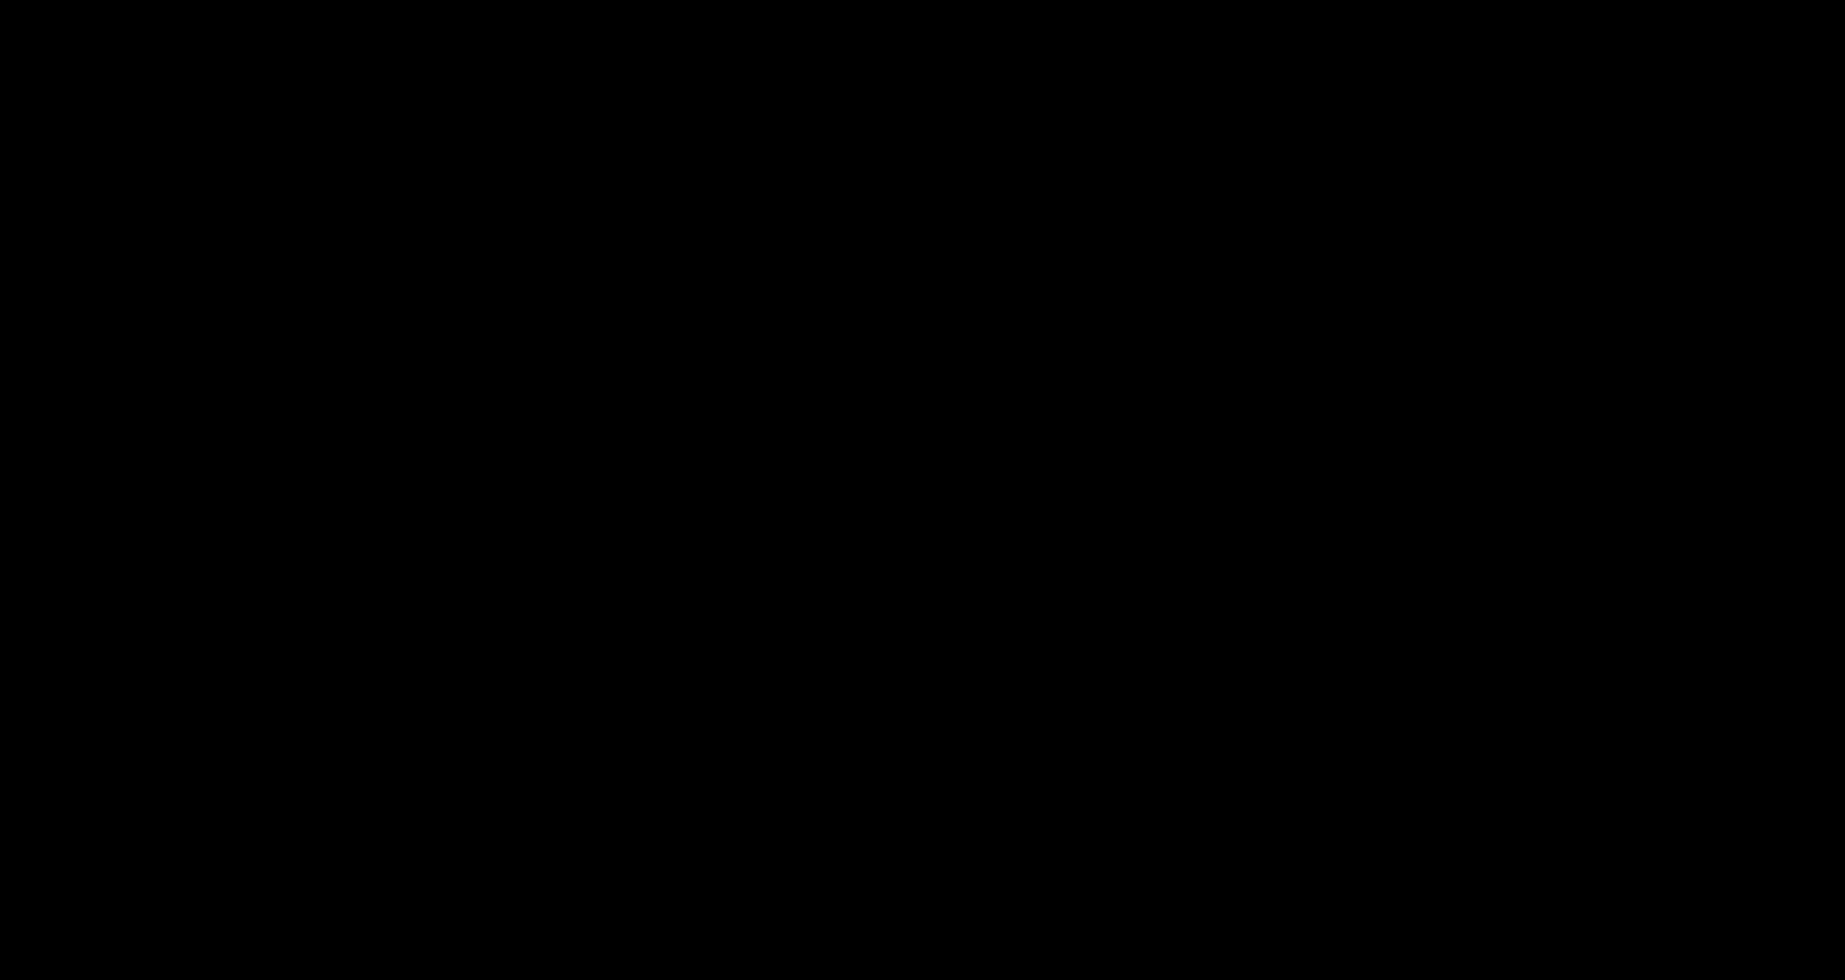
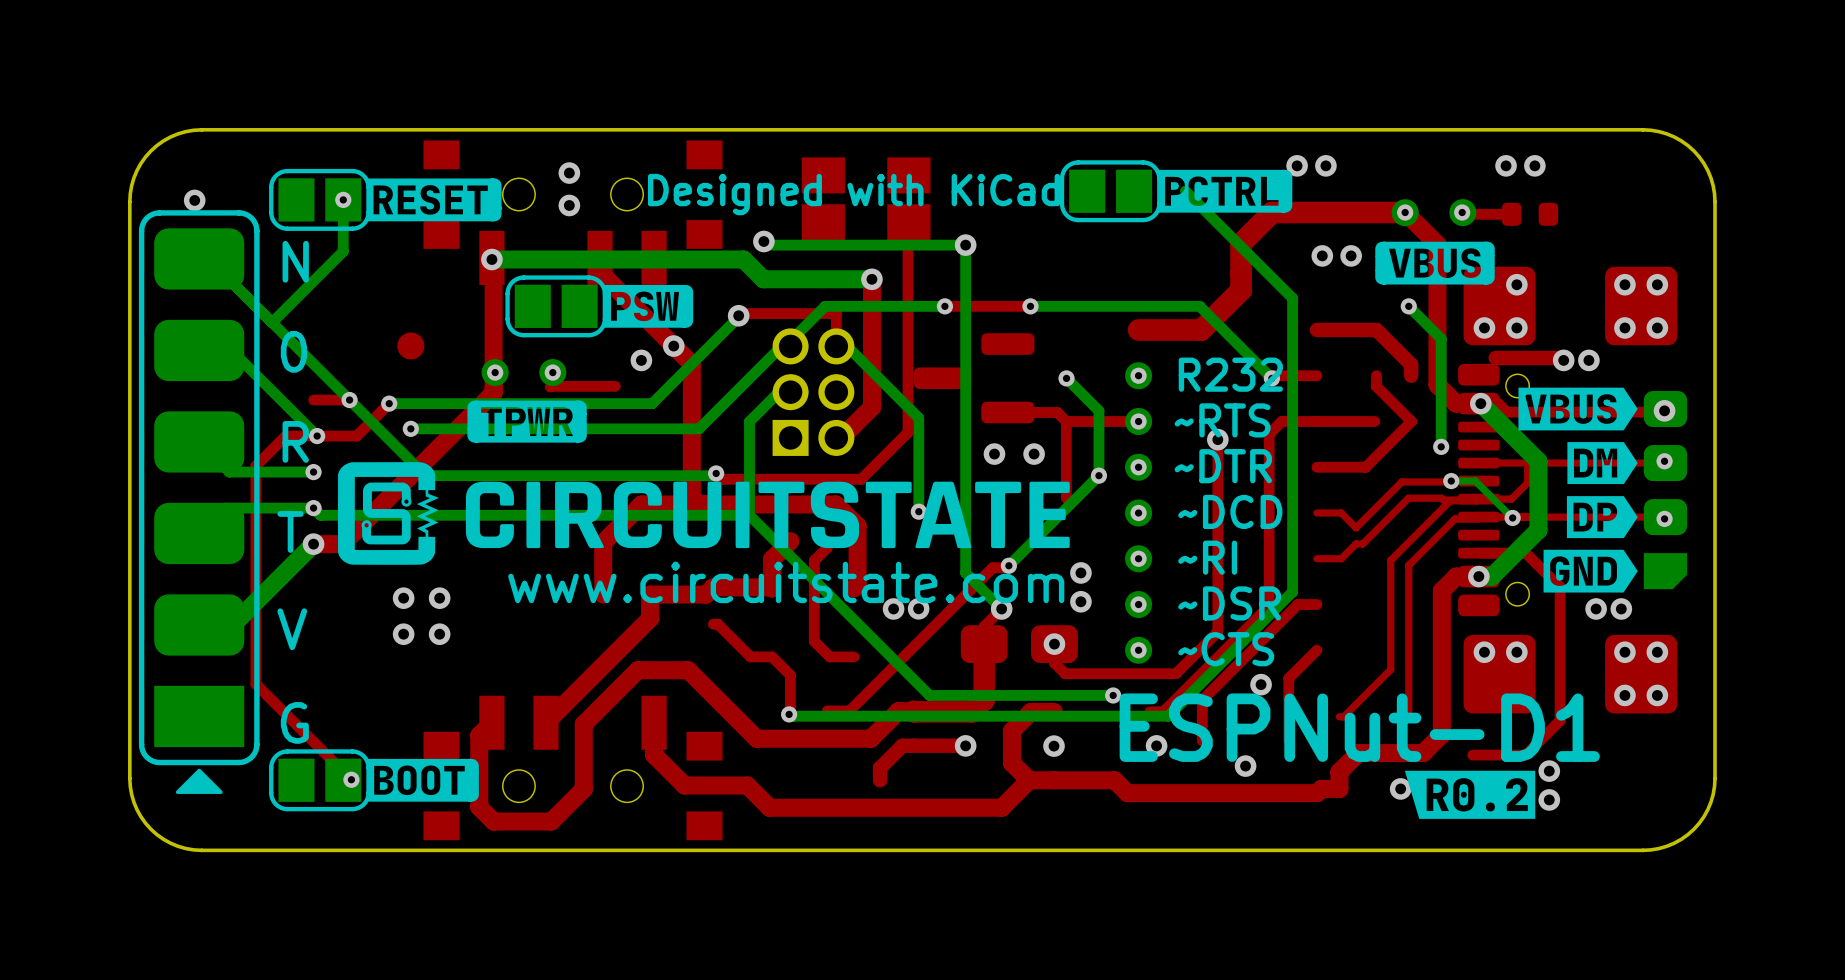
board edge: none -> (1642, 129) (201, 129) (185, 131) (170, 136) (156, 145) (140, 163) (133, 178) (129, 201) (129, 778) (131, 794) (136, 809) (145, 823) (163, 839) (178, 846) (201, 850) (1642, 850) (1658, 848) (1674, 843) (1687, 834) (1699, 823) (1710, 802) (1714, 786) (1715, 201) (1710, 178) (1703, 163) (1693, 150) (1681, 140) (1666, 133) (1642, 129)
via: none -> (1297, 165)
via: none -> (1325, 165)
via: none -> (1506, 165)
via: none -> (1534, 165)
drawing: none -> [1158, 169, 1293, 213]
via: none -> (569, 173)
drawing: none -> [366, 178, 502, 222]
part: none -> (1110, 191)
bottom track: none -> (1185, 191) (1292, 298) (1292, 591) (1168, 716) (793, 716) (789, 714)
text: none -> Designed with KiCad (853, 194)
part: none -> (823, 198)
part: none -> (908, 198)
part: none -> (319, 199)
bottom track: none -> (343, 199) (343, 251) (272, 322)
via: none -> (343, 199)
via: none -> (194, 200)
via: none -> (569, 205)
part: none -> (572, 212)
part: none -> (1405, 212)
via: none -> (1405, 212)
top track: none -> (1462, 212) (1463, 214) (1511, 214)
part: none -> (1462, 212)
via: none -> (1462, 212)
part: none -> (1530, 214)
top track: none -> (908, 222) (908, 432) (861, 479) (721, 479) (716, 473)
bottom track: none -> (763, 241) (767, 245) (965, 245) (965, 572) (1001, 608)
via: none -> (763, 241)
drawing: none -> [1375, 241, 1495, 285]
via: none -> (965, 245)
via: none -> (1322, 255)
via: none -> (1351, 255)
top track: none -> (491, 257) (493, 259) (493, 392) (342, 544) (313, 544)
top track: none -> (600, 257) (600, 272) (691, 364) (691, 497) (699, 504)
bottom track: none -> (199, 258) (208, 258) (425, 475) (713, 475) (716, 473)
bottom track: none -> (491, 259) (743, 259) (763, 279) (871, 279)
via: none -> (491, 259)
text: none -> N (295, 261)
top track: none -> (871, 279) (871, 407) (841, 437) (836, 437)
via: none -> (871, 279)
drawing: none -> [604, 284, 694, 328]
via: none -> (1516, 284)
via: none -> (1624, 284)
via: none -> (1657, 284)
part: none -> (556, 306)
bottom track: none -> (944, 306) (825, 306) (790, 340) (790, 346) (781, 346) (699, 428) (410, 428)
via: none -> (944, 306)
top track: none -> (1030, 306) (944, 306)
bottom track: none -> (1030, 306) (1199, 306) (1271, 378)
via: none -> (1030, 306)
bottom track: none -> (1408, 306) (1441, 338) (1441, 446)
via: none -> (1408, 306)
top track: none -> (738, 315) (740, 313) (836, 313) (836, 346)
bottom track: none -> (738, 315) (652, 403) (389, 403)
via: none -> (738, 315)
via: none -> (1484, 327)
via: none -> (1516, 327)
via: none -> (1624, 327)
via: none -> (1657, 327)
top track: none -> (1138, 329) (1201, 329) (1241, 290) (1241, 243) (1272, 212) (1405, 212) (1437, 244) (1437, 384) (1456, 403) (1498, 403) (1506, 412) (1664, 410)
top track: none -> (1316, 329) (1376, 329) (1411, 364) (1411, 375)
part: none -> (410, 345)
via: none -> (673, 346)
bottom track: none -> (836, 346) (847, 346) (918, 418) (918, 511)
bottom track: none -> (199, 350) (231, 350) (317, 436)
text: none -> 0 (293, 351)
top track: none -> (1495, 358) (1561, 358) (1563, 360)
via: none -> (641, 360)
via: none -> (1563, 360)
via: none -> (1588, 360)
part: none -> (495, 372)
via: none -> (495, 372)
part: none -> (552, 372)
via: none -> (552, 372)
text: none -> R232 (1230, 374)
part: none -> (1138, 375)
via: none -> (1138, 375)
top track: none -> (1316, 375) (1274, 375) (1271, 378)
top track: none -> (1376, 375) (1376, 386) (1411, 421) (1365, 467) (1316, 467)
part: none -> (974, 378)
bottom track: none -> (1066, 378) (1098, 410) (1098, 475) (1008, 565)
via: none -> (1066, 378)
via: none -> (1271, 378)
top track: none -> (615, 386) (550, 387)
drawing: none -> [1518, 387, 1638, 593]
bottom track: none -> (790, 392) (778, 392) (749, 421) (749, 515)
part: none -> (813, 392)
drawing: none -> [337, 400, 1070, 565]
top track: none -> (349, 400) (313, 400)
via: none -> (349, 400)
top track: none -> (389, 403) (356, 436) (285, 436) (255, 465) (255, 684) (351, 779)
via: none -> (389, 403)
bottom track: none -> (1480, 403) (1538, 461) (1538, 530) (1491, 576) (1478, 576)
via: none -> (1480, 403)
via: none -> (1664, 410)
top track: none -> (1007, 412) (1057, 412) (1066, 421)
text: none -> ~RTS (1222, 420)
top track: none -> (1066, 421) (1066, 498)
top track: none -> (1138, 421) (1066, 421)
part: none -> (1138, 421)
via: none -> (1138, 421)
top track: none -> (1374, 421) (1281, 421) (1269, 434) (1269, 606) (1163, 711) (1149, 711)
via: none -> (410, 428)
via: none -> (317, 436)
top track: none -> (1217, 439) (1217, 631) (1175, 673) (1065, 673) (1054, 663) (1054, 644)
via: none -> (1217, 439)
bottom track: none -> (199, 441) (229, 472) (313, 472)
text: none -> R (295, 441)
via: none -> (1441, 446)
via: none -> (994, 454)
via: none -> (1034, 454)
top track: none -> (1664, 461) (1662, 463) (1478, 463)
via: none -> (1664, 461)
top track: none -> (1527, 463) (1527, 482) (1511, 499) (1408, 498) (1362, 543) (1356, 543) (1341, 558) (1316, 558)
text: none -> ~DTR (1223, 466)
part: none -> (1138, 467)
via: none -> (1138, 467)
via: none -> (313, 472)
via: none -> (716, 473)
via: none -> (1098, 475)
bottom track: none -> (1451, 481) (1475, 481) (1512, 517)
via: none -> (1451, 481)
top track: none -> (1478, 481) (1401, 481) (1356, 527)
part: none -> (1567, 490)
part: none -> (1665, 490)
top track: none -> (1478, 499) (1477, 500) (1450, 500) (1390, 560) (1390, 669) (1343, 716) (1339, 716)
part: none -> (199, 502)
via: none -> (313, 508)
via: none -> (918, 511)
text: none -> ~DCD (1230, 511)
part: none -> (1138, 513)
via: none -> (1138, 513)
top track: none -> (1316, 513) (1341, 513) (1356, 527)
bottom track: none -> (749, 515) (320, 515) (313, 508) (224, 508) (199, 533)
bottom track: none -> (749, 515) (929, 695) (1113, 695)
via: none -> (1512, 517)
top track: none -> (1664, 518) (1662, 517) (1478, 517) (1478, 518) (1455, 518) (1408, 565) (1407, 716)
via: none -> (1664, 518)
text: none -> T (290, 531)
top track: none -> (790, 541) (772, 559) (772, 588) (713, 587) (706, 594) (650, 594) (650, 618) (545, 722)
top track: none -> (827, 541) (827, 547) (814, 560) (814, 641) (829, 656) (854, 656)
bottom track: none -> (313, 544) (232, 624) (199, 624)
via: none -> (313, 544)
top track: none -> (1478, 553) (1525, 553) (1560, 587) (1560, 720) (1525, 755) (1472, 755)
text: none -> ~RI (1207, 557)
part: none -> (1138, 558)
via: none -> (1138, 558)
via: none -> (1008, 565)
top track: none -> (1007, 567) (992, 567) (849, 710) (827, 710)
via: none -> (1080, 572)
top track: none -> (1478, 576) (1456, 576) (1441, 590) (1441, 734) (1423, 753) (1358, 753) (1339, 772) (1339, 788) (1321, 788) (1317, 793) (1127, 793) (1114, 780) (1029, 780)
via: none -> (1478, 576)
text: none -> www.circuitstate.com (786, 582)
top track: none -> (854, 588) (857, 584) (857, 526) (835, 504) (641, 504) (603, 542) (603, 594)
via: none -> (403, 598)
via: none -> (439, 598)
via: none -> (1080, 601)
text: none -> ~DSR (1229, 603)
part: none -> (1138, 604)
via: none -> (1138, 604)
top track: none -> (1316, 604) (1297, 604) (1202, 700) (1202, 740)
via: none -> (893, 608)
via: none -> (918, 608)
top track: none -> (1001, 608) (984, 626) (984, 699) (972, 711) (898, 711) (870, 738) (756, 738) (688, 670) (637, 670) (583, 724) (583, 789) (551, 821) (493, 821) (479, 807) (479, 735) (491, 722)
via: none -> (1001, 608)
via: none -> (1596, 608)
via: none -> (1621, 608)
top track: none -> (713, 624) (717, 624) (750, 656) (772, 656) (790, 675) (790, 710)
text: none -> V (292, 629)
via: none -> (403, 634)
via: none -> (439, 634)
part: none -> (1019, 644)
via: none -> (1054, 644)
text: none -> ~CTS (1226, 649)
part: none -> (1138, 650)
via: none -> (1138, 650)
top track: none -> (1316, 650) (1288, 678) (1288, 740)
via: none -> (1484, 652)
via: none -> (1516, 652)
via: none -> (1624, 652)
via: none -> (1657, 652)
via: none -> (1261, 684)
via: none -> (1113, 695)
via: none -> (1624, 695)
via: none -> (1657, 695)
top track: none -> (1054, 711) (1031, 711) (1012, 730) (1012, 763) (1029, 780)
via: none -> (789, 714)
text: none -> G (294, 722)
top track: none -> (654, 722) (654, 754) (684, 785) (747, 785) (769, 807) (1001, 807) (1029, 780)
text: none -> ESPNut-D1 (1359, 727)
top track: none -> (965, 745) (902, 745) (880, 768) (880, 780)
via: none -> (965, 745)
via: none -> (1156, 745)
via: none -> (1054, 746)
drawing: none -> [367, 758, 479, 802]
via: none -> (1245, 766)
part: none -> (572, 767)
drawing: none -> [1404, 770, 1536, 819]
via: none -> (1549, 771)
via: none -> (351, 779)
part: none -> (319, 780)
via: none -> (1400, 788)
via: none -> (1549, 799)

